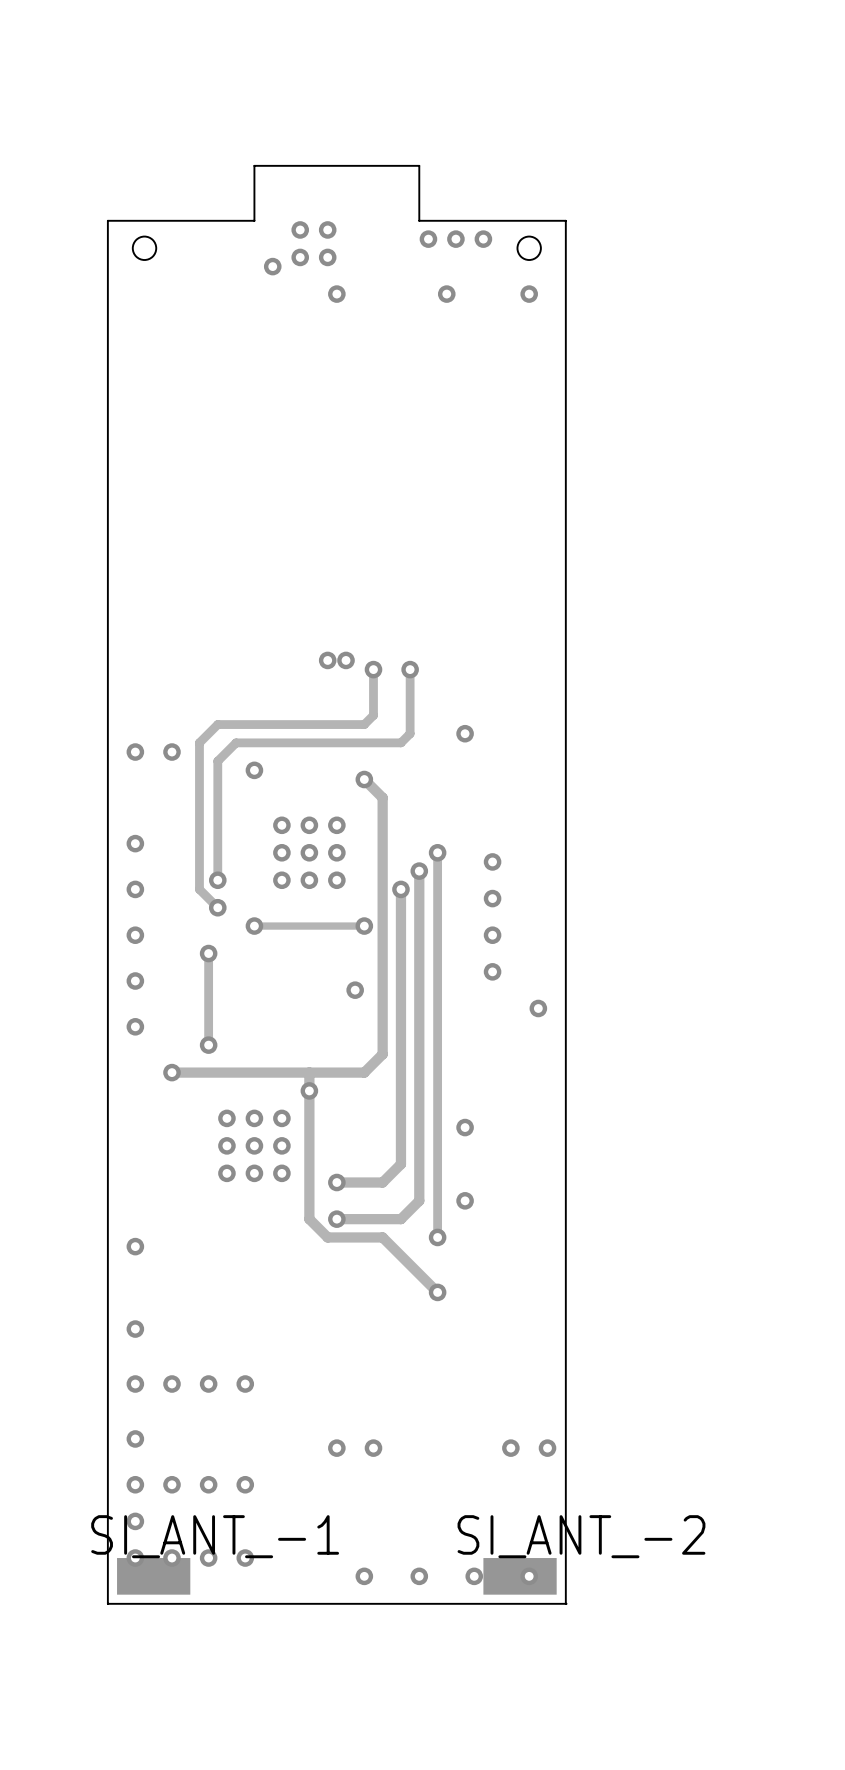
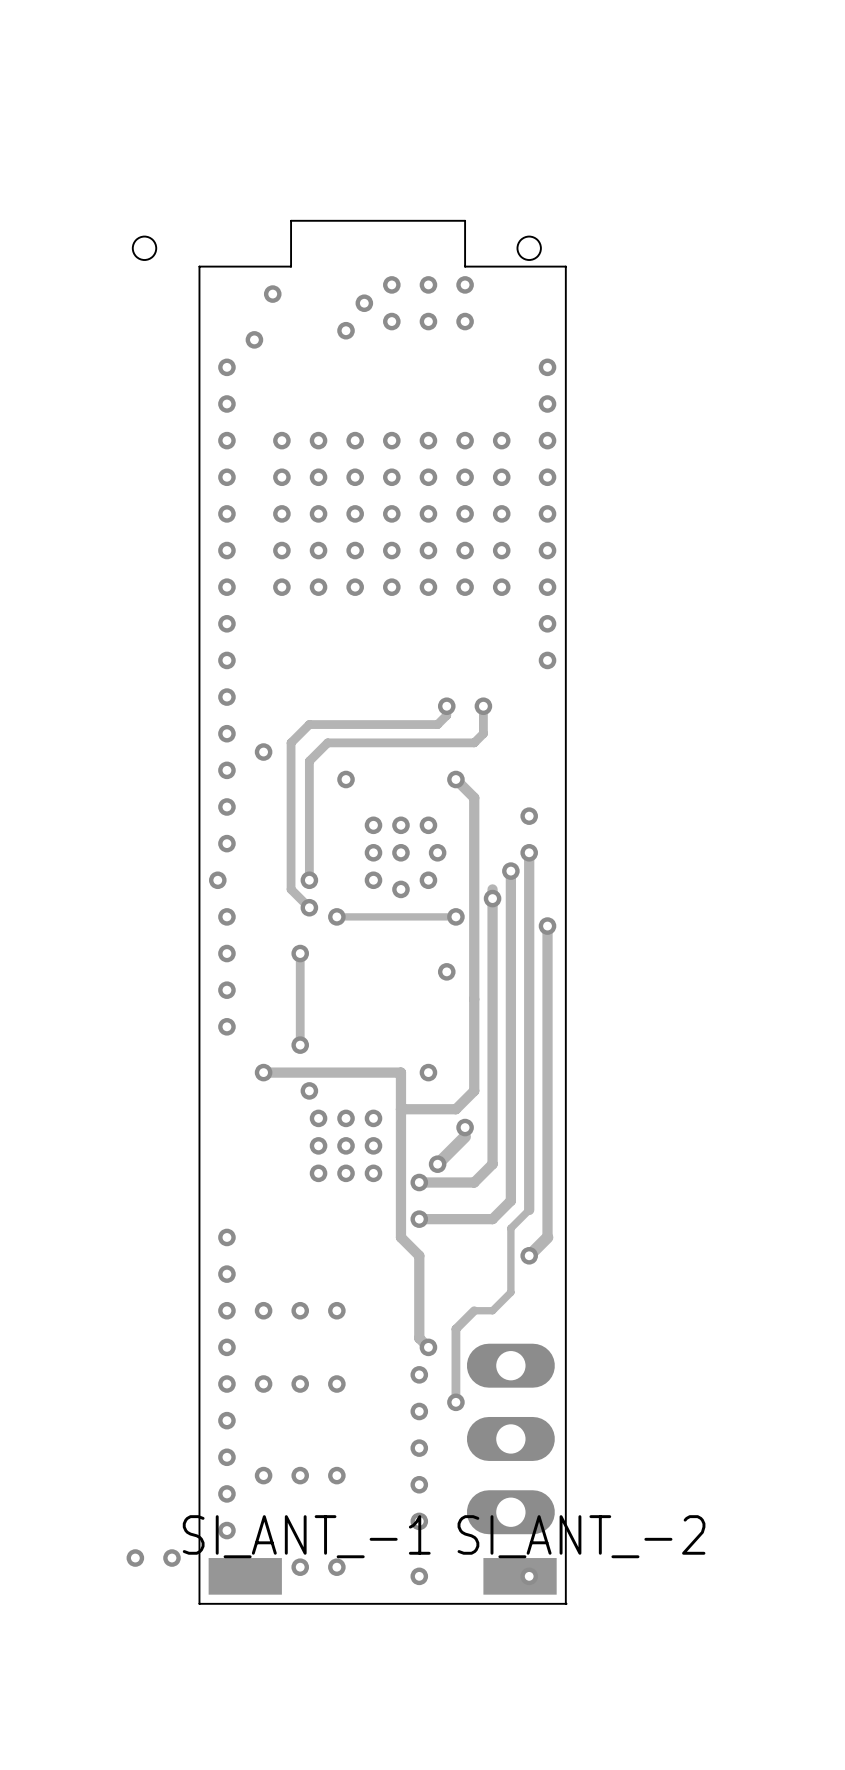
board edge: (419, 220) (419, 165) (254, 165) (254, 220) (107, 220) (107, 1603) (199, 1603) -> (419, 220) (291, 220) (291, 266) (199, 266) (199, 1603)
board edge: (465, 220) (565, 220) (565, 266) -> (465, 220) (465, 266) (565, 266)
via: (300, 229) -> none
via: (327, 229) -> none
via: (428, 239) -> none
via: (455, 239) -> none
via: (483, 239) -> none
via: (300, 257) -> none
via: (327, 257) -> none
via: (272, 266) -> none
via: none -> (391, 284)
via: none -> (428, 284)
via: none -> (465, 284)
via: none -> (272, 294)
via: (336, 294) -> none
via: (446, 294) -> none
via: (529, 294) -> none
via: none -> (364, 303)
via: none -> (391, 321)
via: none -> (428, 321)
via: none -> (465, 321)
via: none -> (346, 330)
via: none -> (254, 339)
via: none -> (226, 367)
via: none -> (547, 367)
via: none -> (226, 403)
via: none -> (547, 403)
via: none -> (226, 440)
via: none -> (281, 440)
via: none -> (318, 440)
via: none -> (355, 440)
via: none -> (391, 440)
via: none -> (428, 440)
via: none -> (465, 440)
via: none -> (501, 440)
via: none -> (547, 440)
via: none -> (226, 477)
via: none -> (281, 477)
via: none -> (318, 477)
via: none -> (355, 477)
via: none -> (391, 477)
via: none -> (428, 477)
via: none -> (465, 477)
via: none -> (501, 477)
via: none -> (547, 477)
via: none -> (226, 513)
via: none -> (281, 513)
via: none -> (318, 513)
via: none -> (355, 513)
via: none -> (391, 513)
via: none -> (428, 513)
via: none -> (465, 513)
via: none -> (501, 513)
via: none -> (547, 513)
via: none -> (226, 550)
via: none -> (281, 550)
via: none -> (318, 550)
via: none -> (355, 550)
via: none -> (391, 550)
via: none -> (428, 550)
via: none -> (465, 550)
via: none -> (501, 550)
via: none -> (547, 550)
via: none -> (226, 587)
via: none -> (281, 587)
via: none -> (318, 587)
via: none -> (355, 587)
via: none -> (391, 587)
via: none -> (428, 587)
via: none -> (465, 587)
via: none -> (501, 587)
via: none -> (547, 587)
via: none -> (226, 623)
via: none -> (547, 623)
via: none -> (226, 660)
via: (327, 660) -> none
via: (346, 660) -> none
via: none -> (547, 660)
track: (373, 669) (373, 715) (364, 724) -> (446, 706) (446, 715) (437, 724) (364, 724)
via: (373, 669) -> none
track: (410, 669) (410, 733) (400, 742) -> (483, 706) (483, 733) (474, 742) (400, 742)
via: (410, 669) -> none
via: none -> (226, 697)
via: none -> (446, 706)
via: none -> (483, 706)
track: (309, 724) (217, 724) (199, 742) (199, 889) (217, 907) -> (309, 724) (291, 742) (291, 889) (309, 907)
via: none -> (226, 733)
via: (465, 733) -> none
track: (327, 742) (236, 742) (217, 761) (217, 880) -> (327, 742) (309, 761) (309, 880)
via: (135, 752) -> none
via: (171, 752) -> none
via: none -> (263, 752)
via: none -> (226, 770)
via: (254, 770) -> none
track: (364, 779) (382, 797) (382, 1054) (364, 1072) -> none
via position: (364, 779) -> (346, 779)
track: none -> (455, 779) (474, 797) (474, 1090) (455, 1109) (400, 1109)
via: none -> (455, 779)
via: none -> (226, 806)
via: none -> (529, 816)
via: (281, 825) -> none
via: (309, 825) -> none
via: (336, 825) -> none
via: none -> (373, 825)
via: none -> (400, 825)
via: none -> (428, 825)
via: (135, 843) -> none
via: none -> (226, 843)
via: (281, 852) -> none
via: (309, 852) -> none
via: (336, 852) -> none
via: none -> (373, 852)
via: none -> (400, 852)
track: (437, 852) (437, 1237) -> none
track: none -> (529, 852) (529, 1209) (510, 1228) (510, 1292) (492, 1310) (474, 1310) (455, 1329) (455, 1402)
via: none -> (529, 852)
via: (492, 861) -> none
track: (419, 871) (419, 1200) (400, 1219) (336, 1219) -> none
via position: (419, 871) -> (428, 880)
track: none -> (510, 871) (510, 1200) (492, 1219) (419, 1219)
via: none -> (510, 871)
via: (281, 880) -> none
via: (336, 880) -> none
via: none -> (373, 880)
via: (135, 889) -> none
track: (400, 889) (400, 1072) -> (364, 1072) (400, 1072)
track: none -> (492, 889) (492, 1164) (474, 1182) (419, 1182)
via position: (217, 907) -> (226, 916)
via: none -> (309, 907)
via: none -> (336, 916)
track: none -> (455, 916) (336, 916)
via: none -> (455, 916)
via: (254, 926) -> none
track: (364, 926) (254, 926) -> none
via: (364, 926) -> none
track: none -> (547, 926) (547, 1237) (529, 1255)
via: none -> (547, 926)
via: (135, 935) -> none
via: (492, 935) -> none
track: (208, 953) (208, 1045) -> (300, 953) (300, 1045)
via position: (208, 953) -> (226, 953)
via: none -> (300, 953)
via: none -> (446, 971)
via: (492, 971) -> none
via: (135, 981) -> none
via: none -> (226, 990)
via: (355, 990) -> none
via: (538, 1008) -> none
via: (135, 1026) -> none
via position: (208, 1045) -> (226, 1026)
via: none -> (300, 1045)
via: (171, 1072) -> none
track: (263, 1072) (171, 1072) -> none
via: none -> (263, 1072)
track: (309, 1072) (309, 1219) (327, 1237) (382, 1237) (437, 1292) -> none
via: none -> (428, 1072)
via: (226, 1118) -> none
via: (254, 1118) -> none
via: (281, 1118) -> none
via: none -> (318, 1118)
via: none -> (346, 1118)
via: none -> (373, 1118)
track: none -> (465, 1136) (437, 1164)
via: (226, 1145) -> none
via: (254, 1145) -> none
via: (281, 1145) -> none
via: none -> (318, 1145)
via: none -> (346, 1145)
via: none -> (373, 1145)
track: (400, 1164) (382, 1182) (336, 1182) -> (400, 1164) (400, 1237) (419, 1255) (419, 1338) (428, 1347)
via: none -> (437, 1164)
via: (226, 1173) -> none
via: (254, 1173) -> none
via: (281, 1173) -> none
via: none -> (318, 1173)
via: none -> (373, 1173)
via position: (336, 1182) -> (346, 1173)
via: none -> (419, 1182)
via: (465, 1200) -> none
via: (336, 1219) -> none
via: none -> (419, 1219)
via: none -> (226, 1237)
via: (437, 1237) -> none
via: (135, 1246) -> none
via: none -> (529, 1255)
via: none -> (226, 1274)
via: (437, 1292) -> none
via: none -> (226, 1310)
via: none -> (263, 1310)
via: none -> (300, 1310)
via: none -> (336, 1310)
via: (135, 1329) -> none
via: none -> (226, 1347)
via: none -> (428, 1347)
via: none -> (419, 1374)
via: (135, 1384) -> none
via: (171, 1384) -> none
via: (208, 1384) -> none
via: none -> (226, 1384)
via: (245, 1384) -> none
via: none -> (263, 1384)
via: none -> (300, 1384)
via: none -> (336, 1384)
via: none -> (455, 1402)
via: none -> (419, 1411)
via: none -> (226, 1420)
via: (135, 1438) -> none
part: none -> (510, 1438)
via: (336, 1448) -> none
via: (373, 1448) -> none
via: none -> (419, 1448)
via: (510, 1448) -> none
via: (547, 1448) -> none
via: none -> (226, 1457)
via: none -> (263, 1475)
via: none -> (300, 1475)
via: none -> (336, 1475)
via: (135, 1484) -> none
via: (171, 1484) -> none
via: (208, 1484) -> none
via: (245, 1484) -> none
via: none -> (419, 1484)
via: none -> (226, 1493)
via: (135, 1521) -> none
via: none -> (419, 1521)
via: none -> (226, 1530)
via: (208, 1558) -> none
via: (245, 1558) -> none
via: none -> (300, 1567)
SI_ANT_-1 position: (153, 1576) -> (245, 1576)
via position: (364, 1576) -> (336, 1567)
via: (474, 1576) -> none

